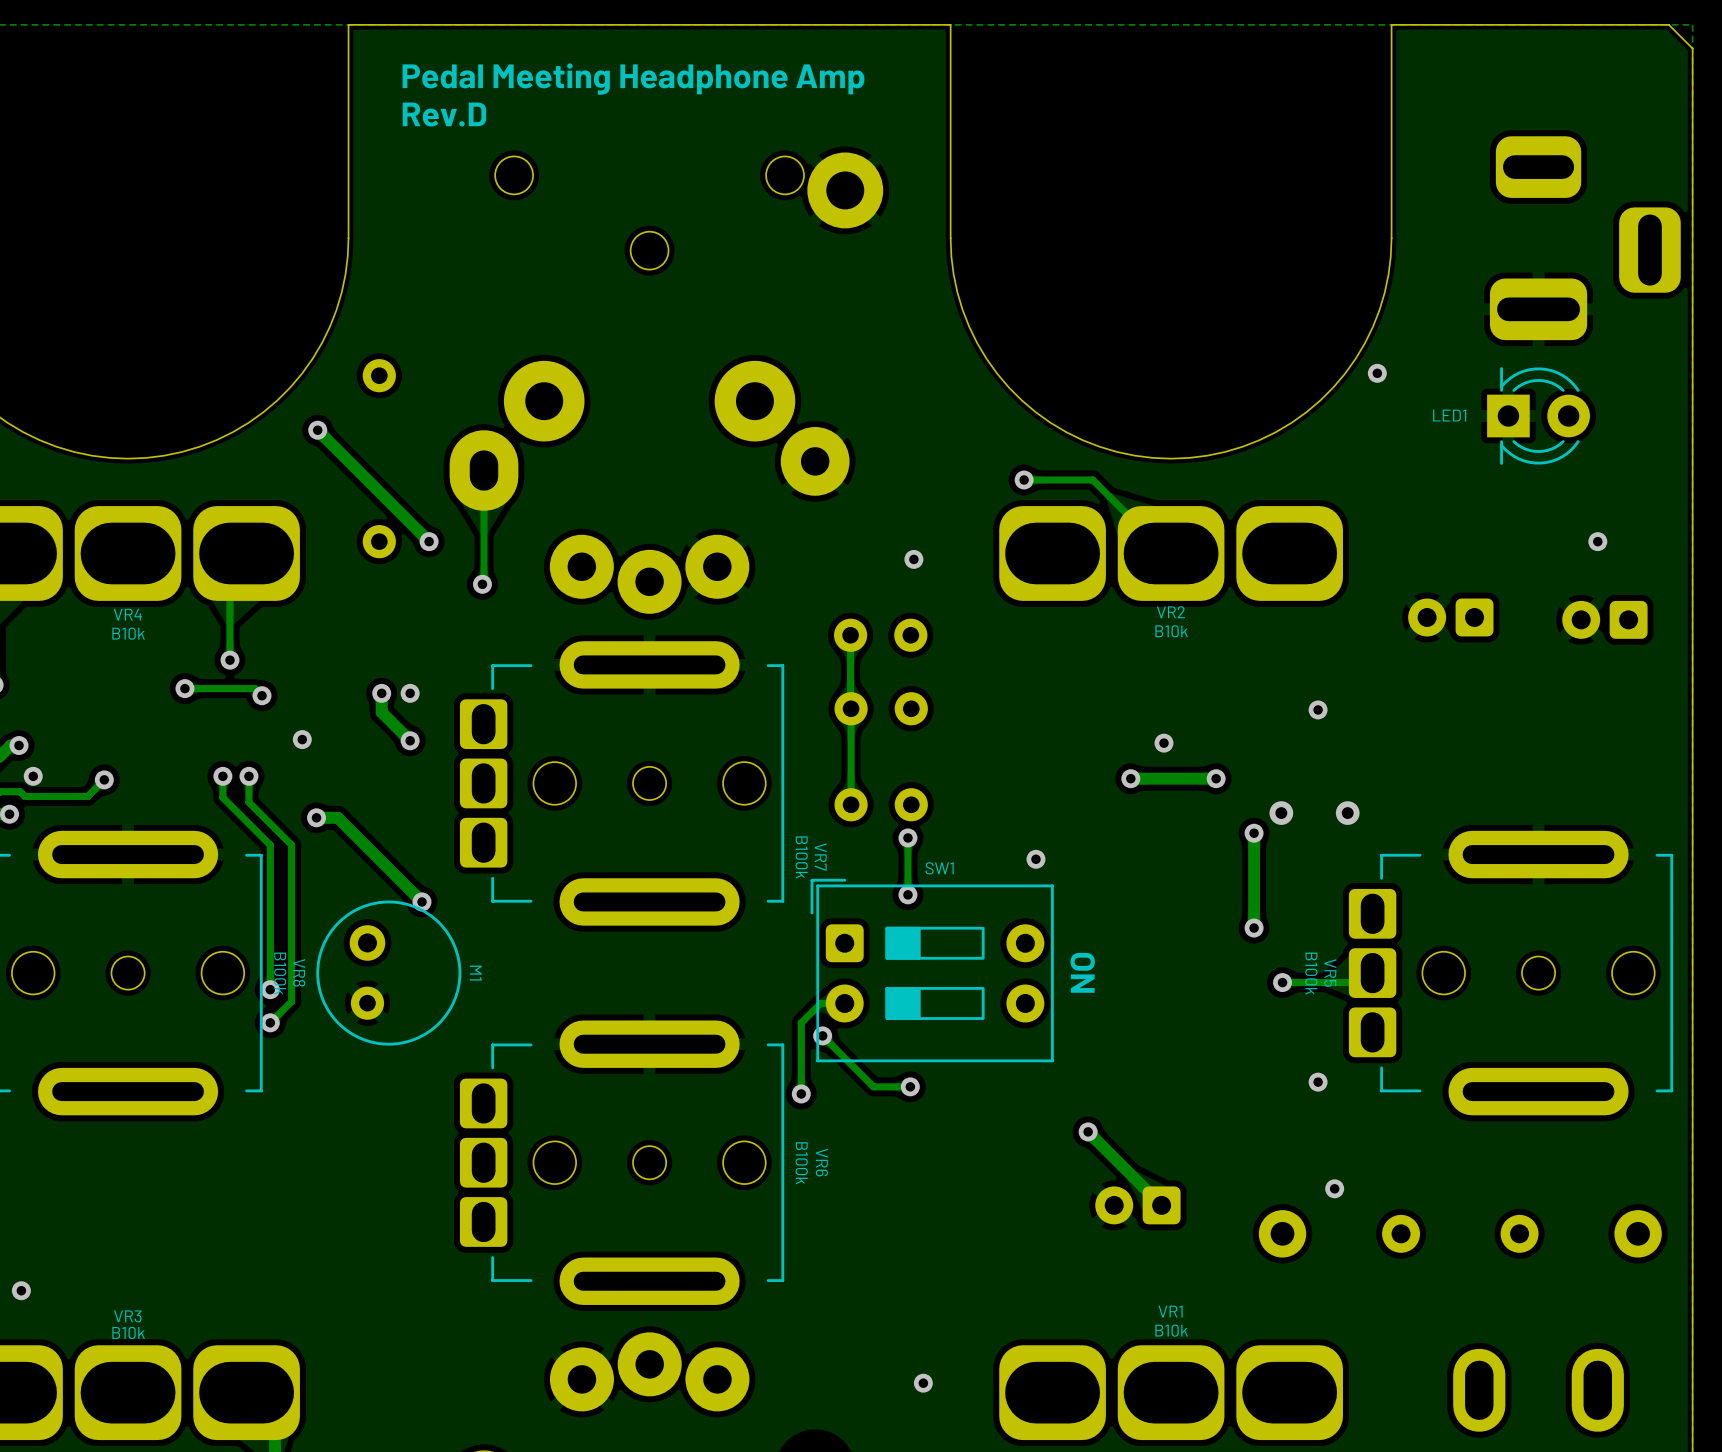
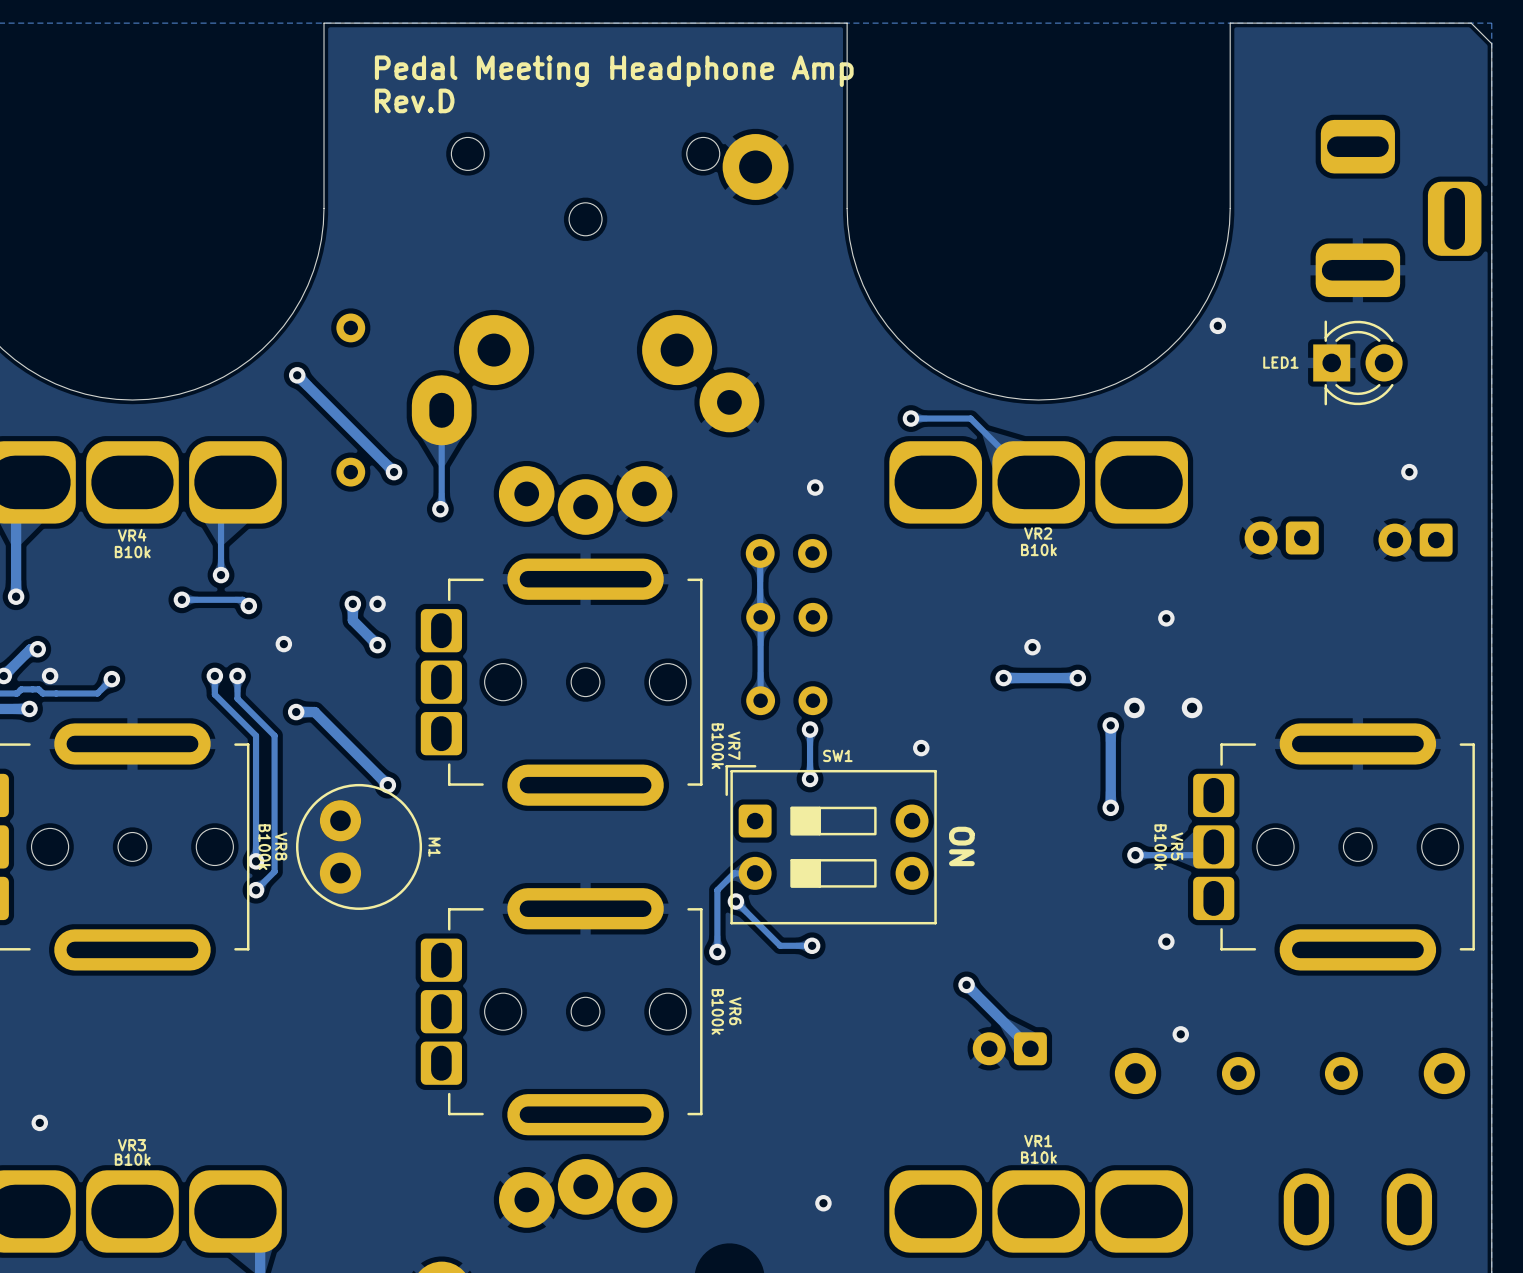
M1 footprint: [316, 900, 462, 1046] -> [295, 783, 423, 910]

